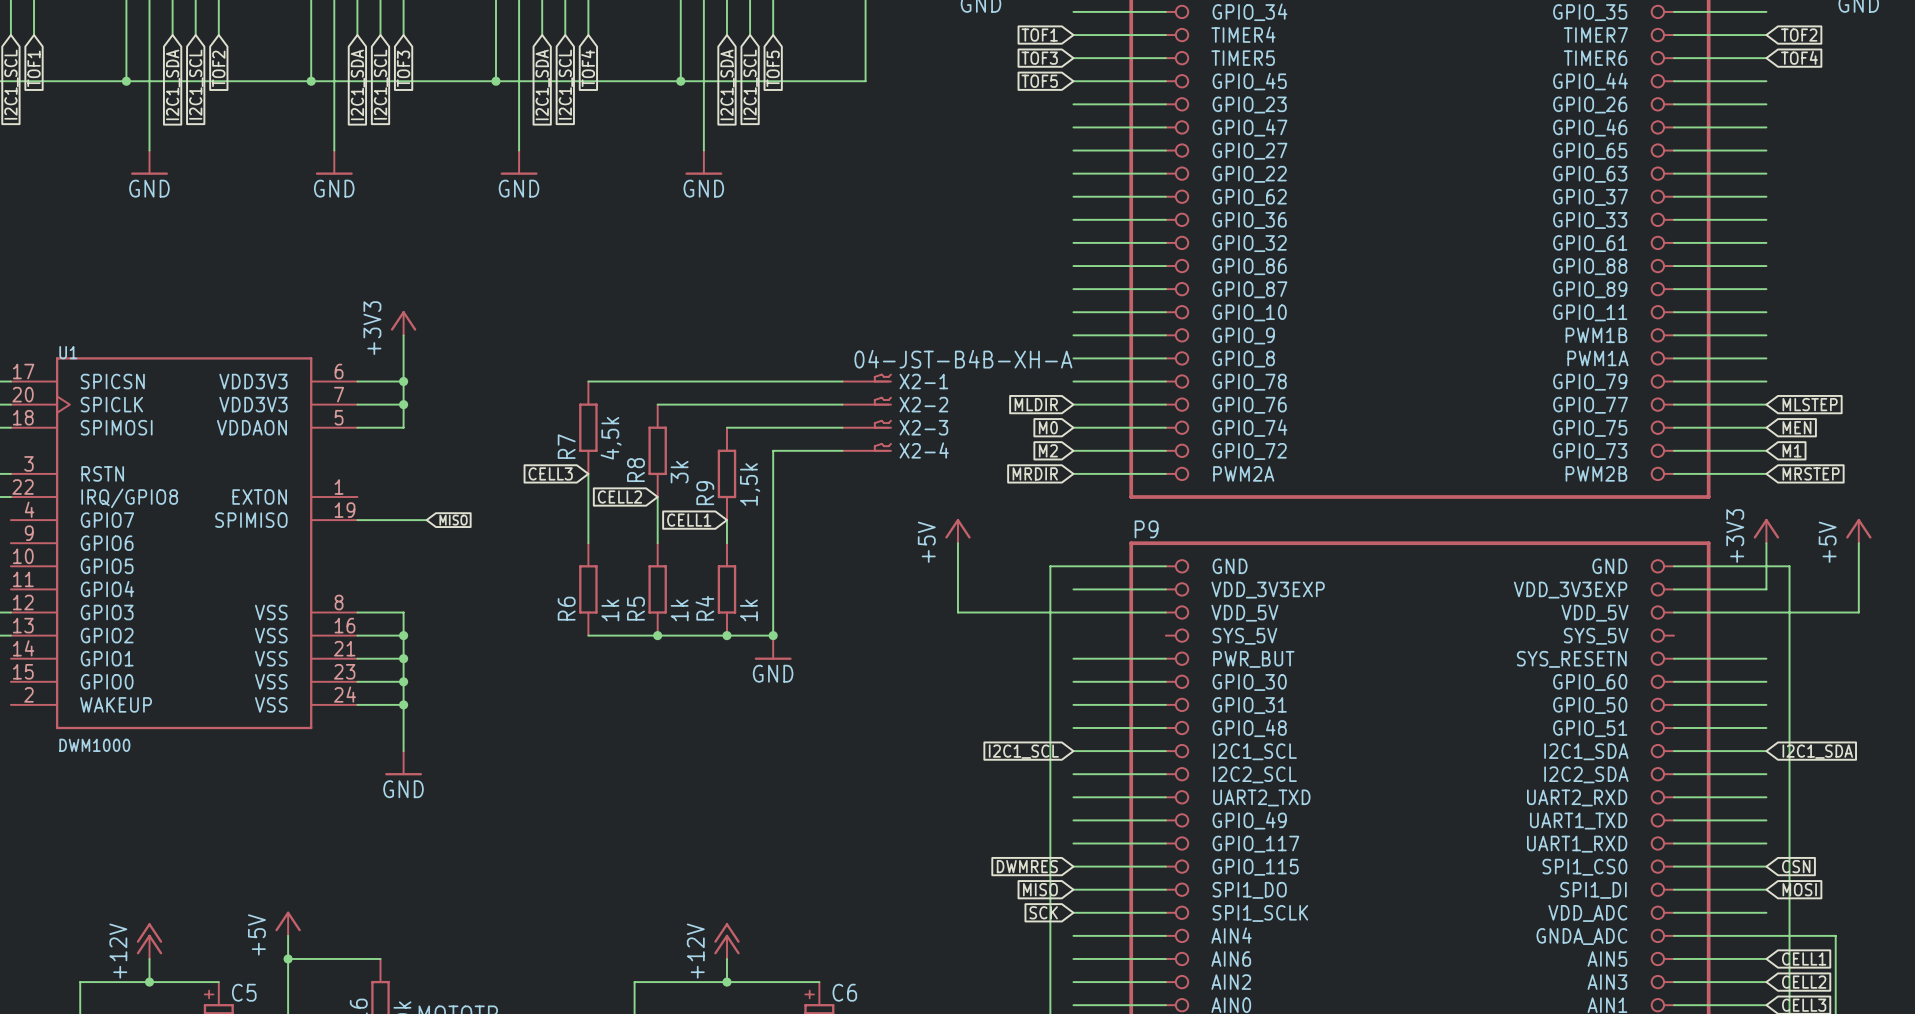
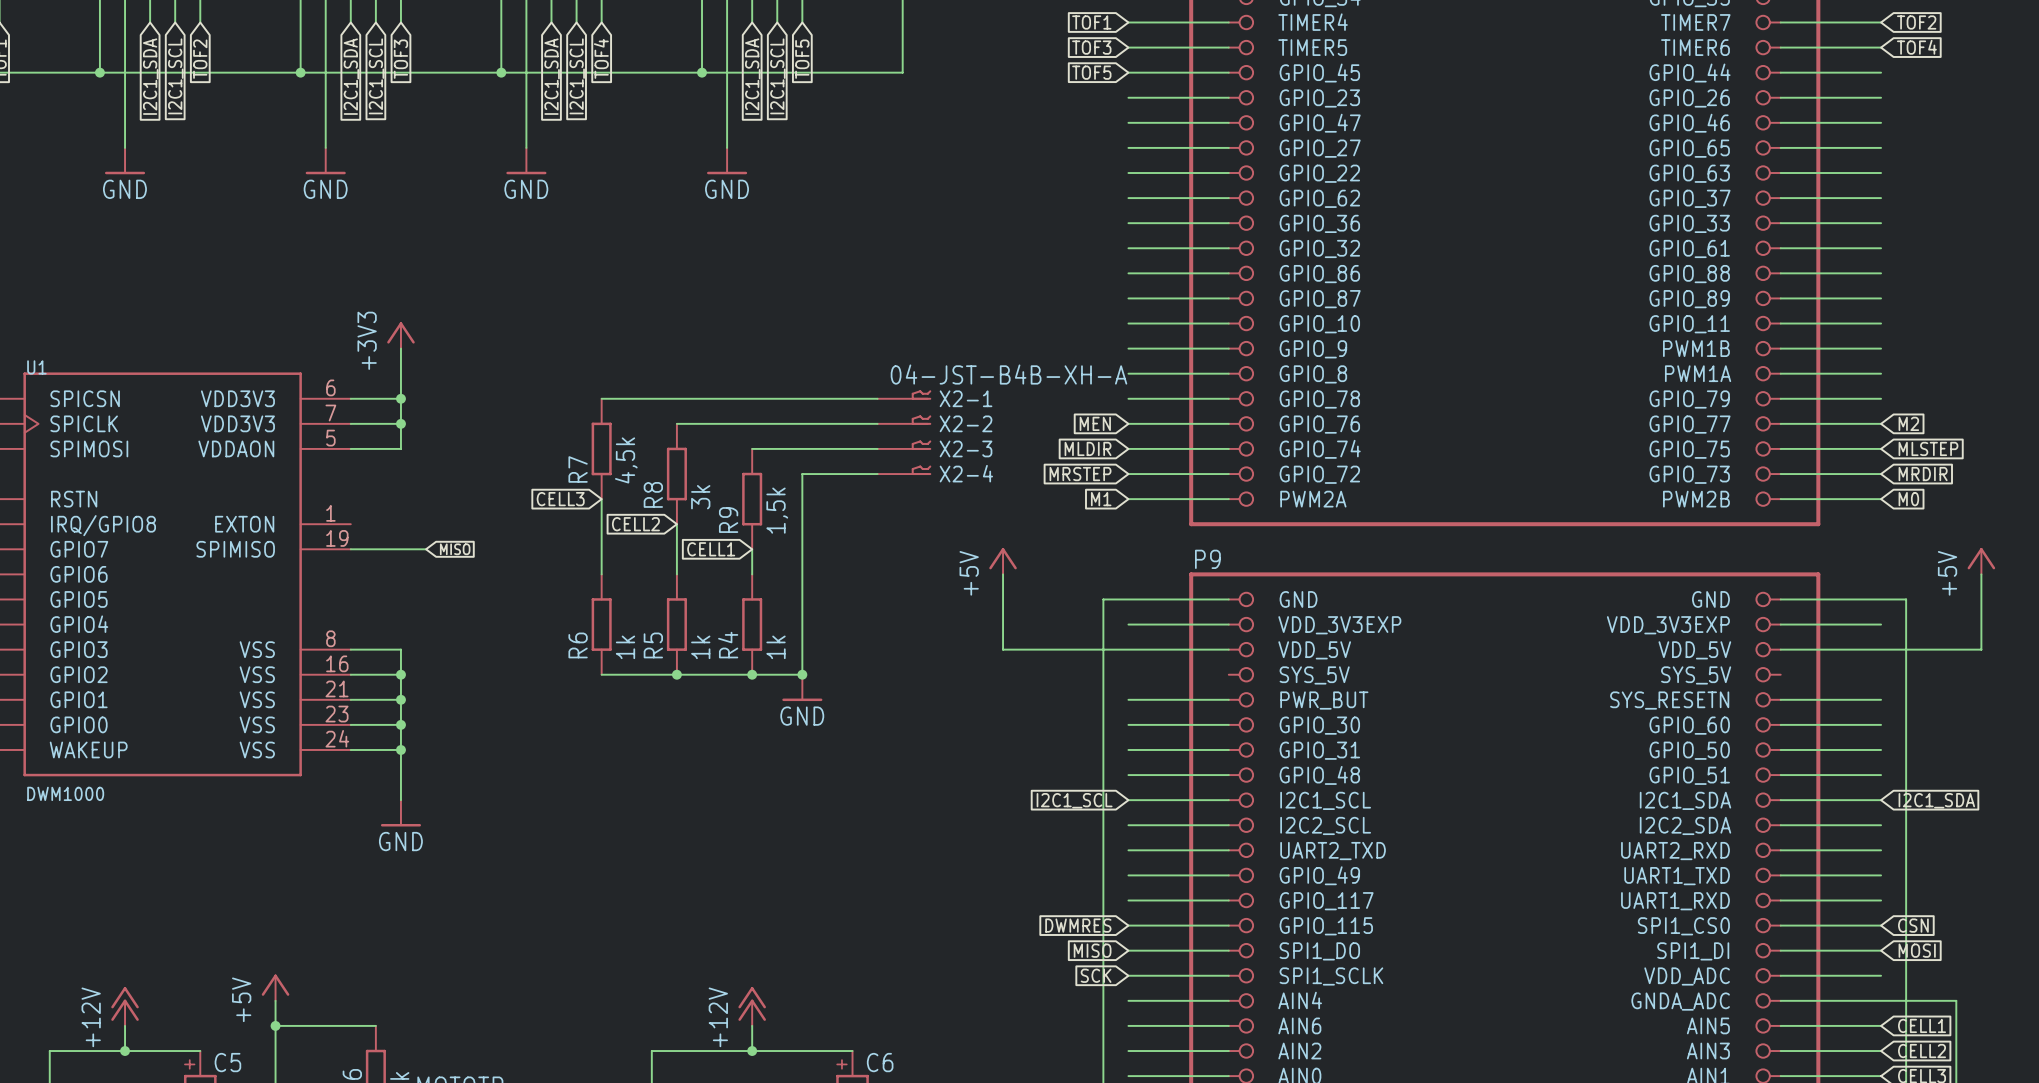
global label: MLDIR (1036, 404) -> MEN (1095, 423)
global label: MLSTEP (1810, 404) -> M2 (1908, 423)
global label: M0 (1048, 427) -> MLDIR (1088, 448)
global label: MEN (1796, 427) -> MLSTEP (1928, 448)
global label: M2 (1048, 450) -> MRSTEP (1080, 474)
global label: M1 (1792, 450) -> MRDIR (1923, 474)
global label: MRDIR (1035, 473) -> M1 (1101, 499)
global label: MRSTEP (1811, 473) -> M0 (1908, 499)
power symbol: +3V3 (1766, 531) -> none
wire: (1766, 543) (1766, 589) -> none

